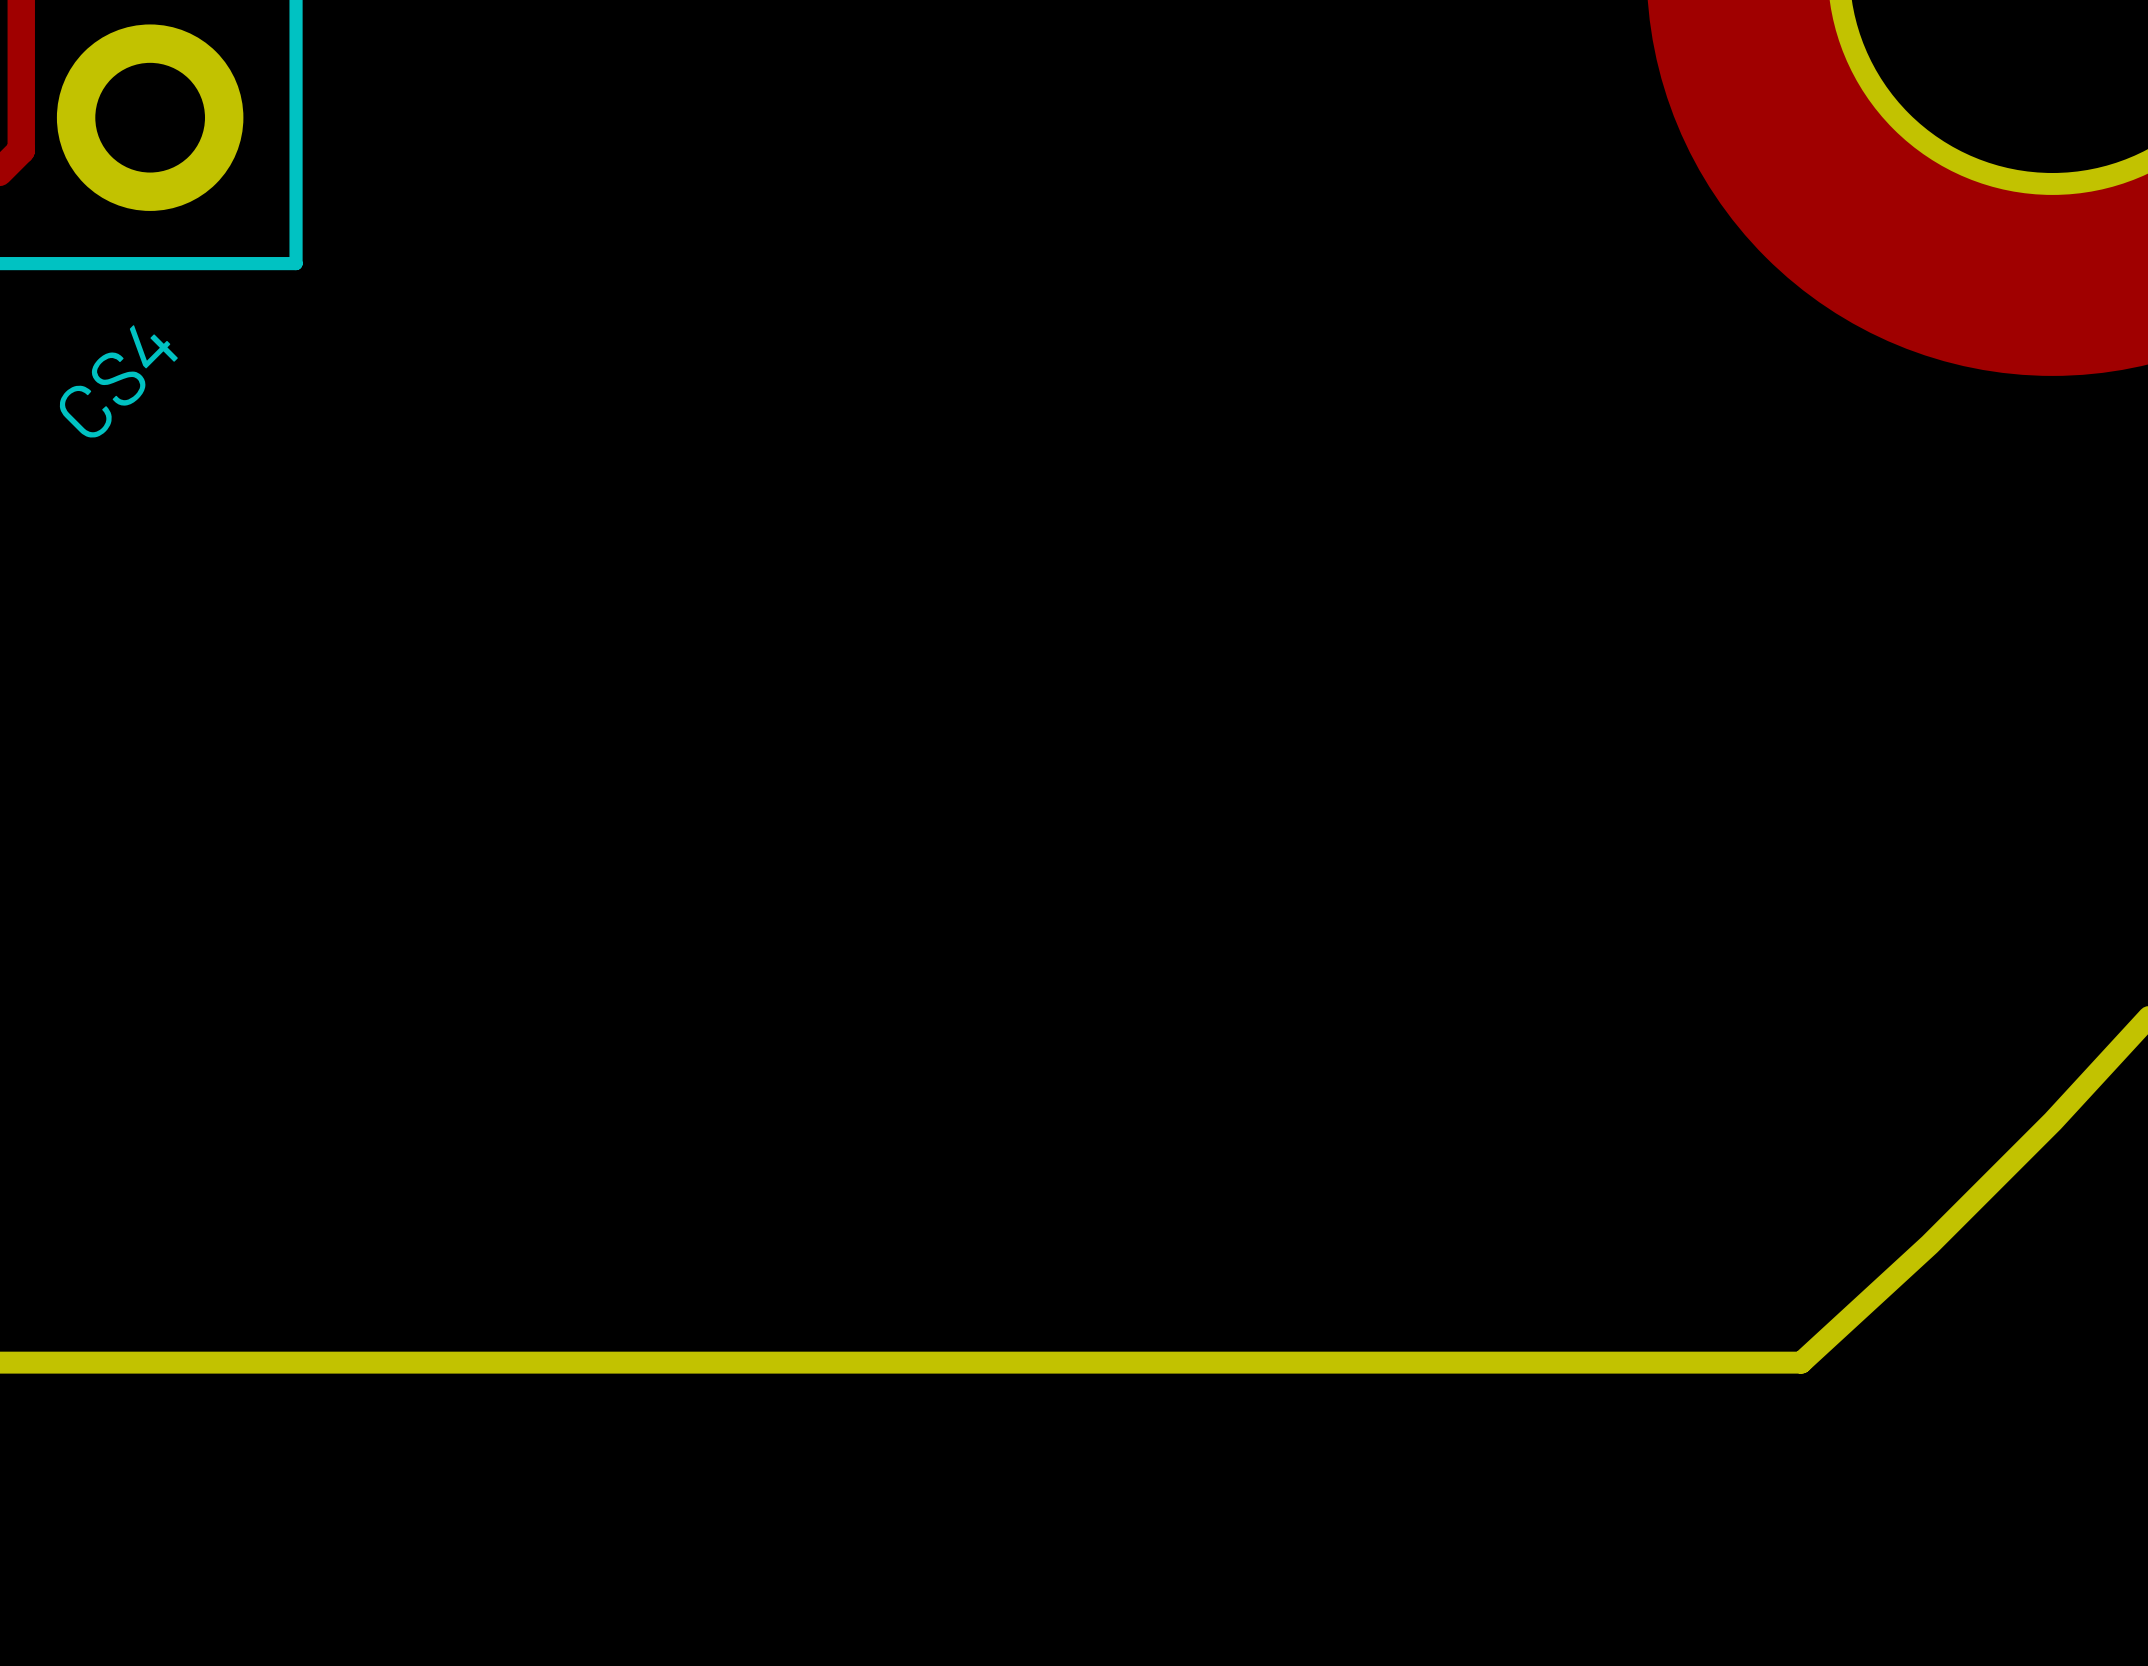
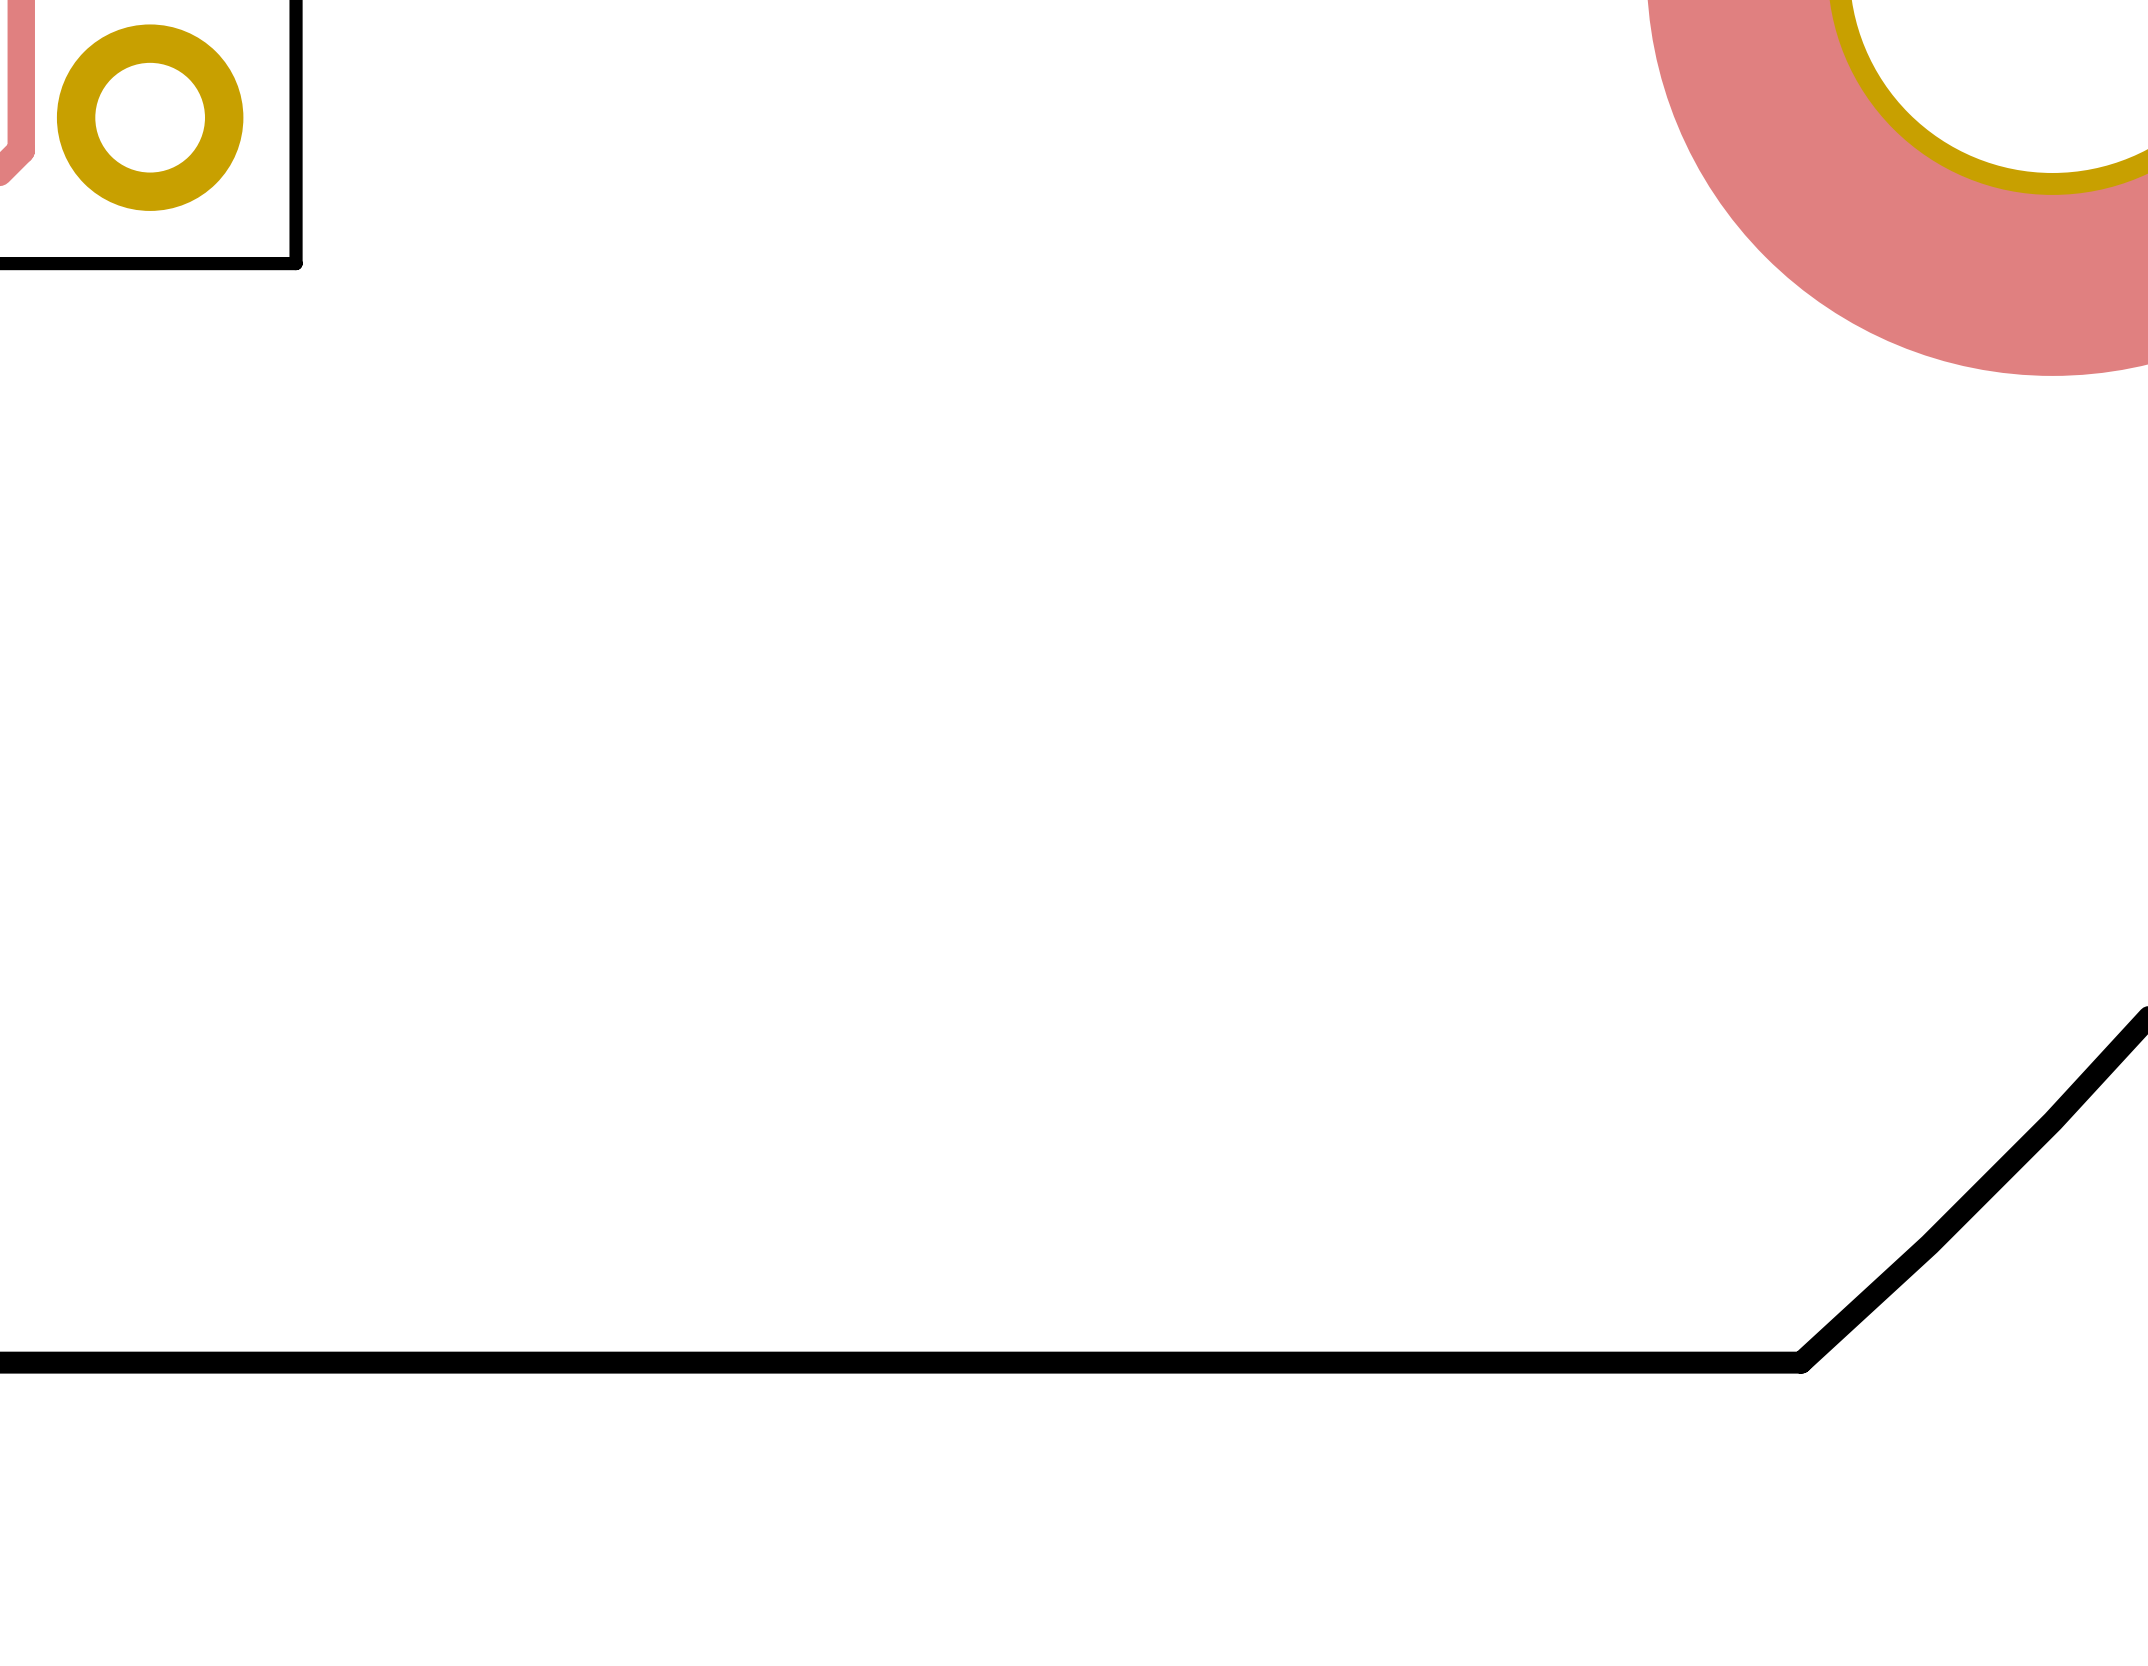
text: CS4 (118, 381) -> none

